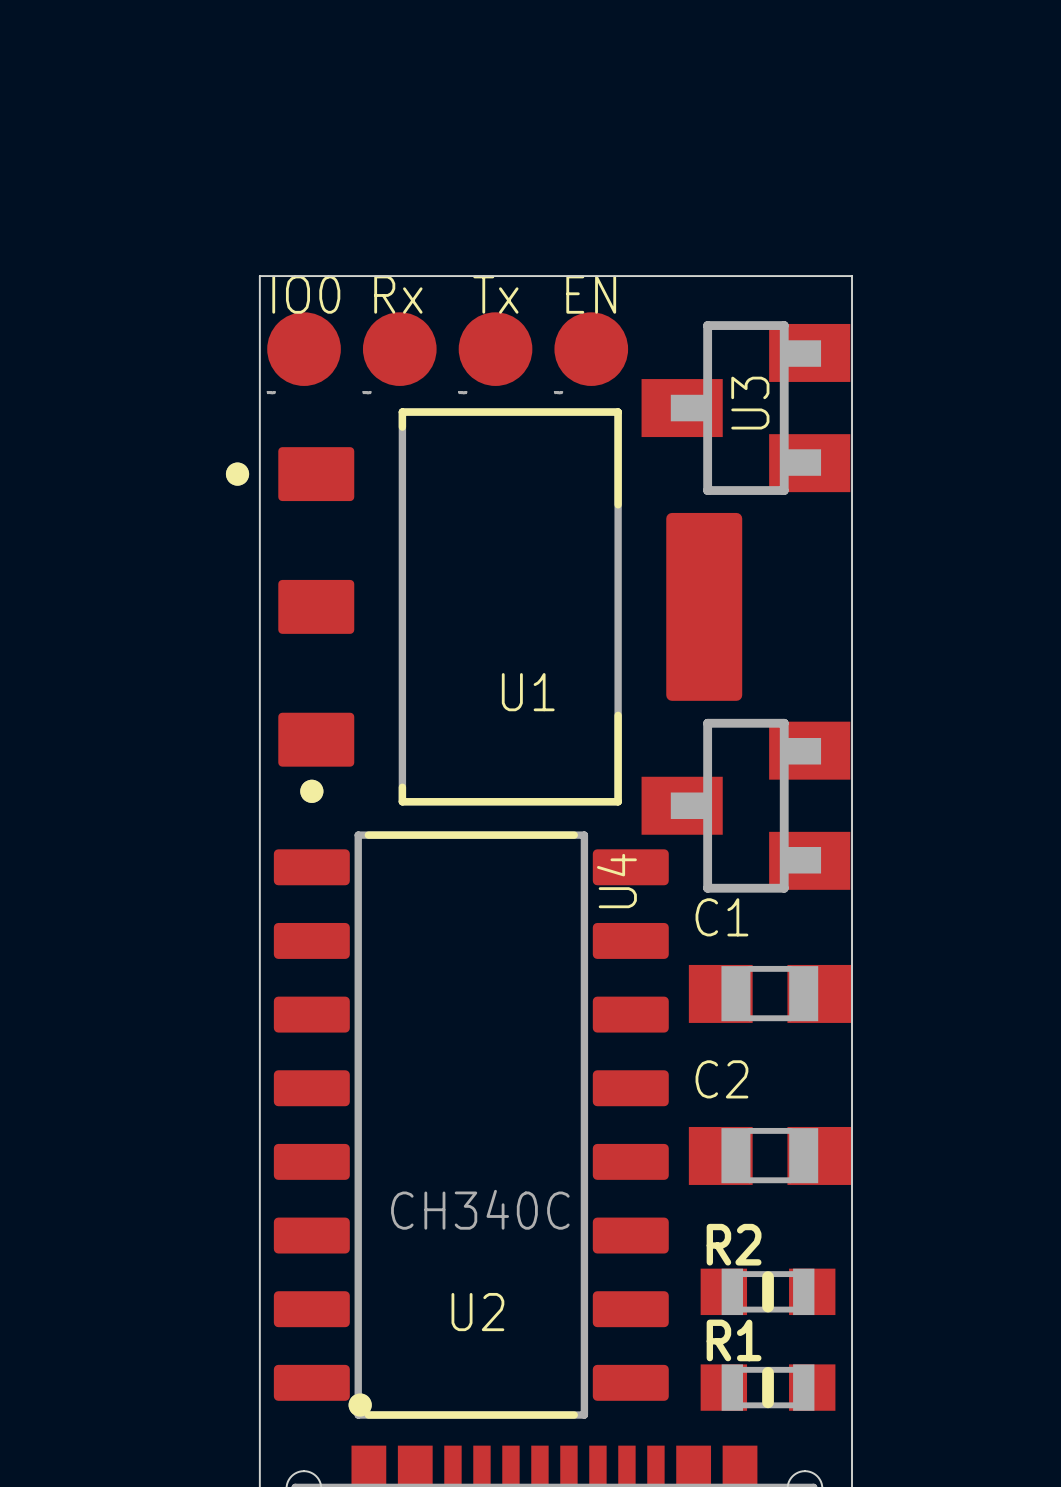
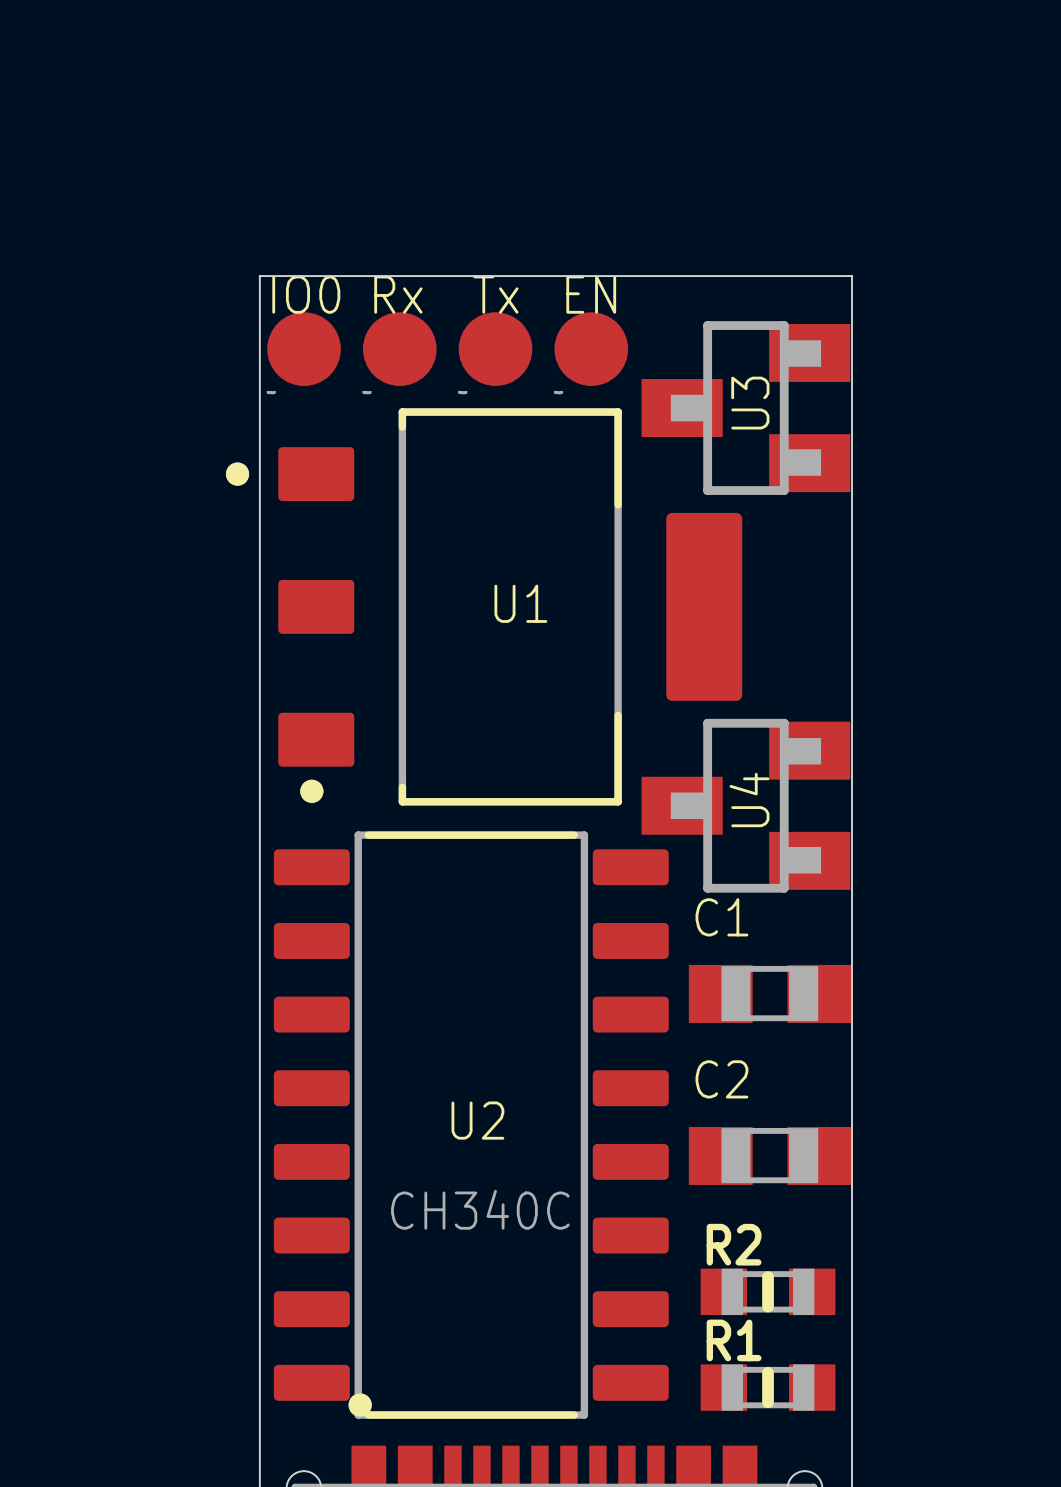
U1 name position: U1 (528, 692) -> U1 (520, 603)
U4 name position: U4 (616, 881) -> U4 (749, 800)
U2 name position: U2 (477, 1312) -> U2 (477, 1120)

